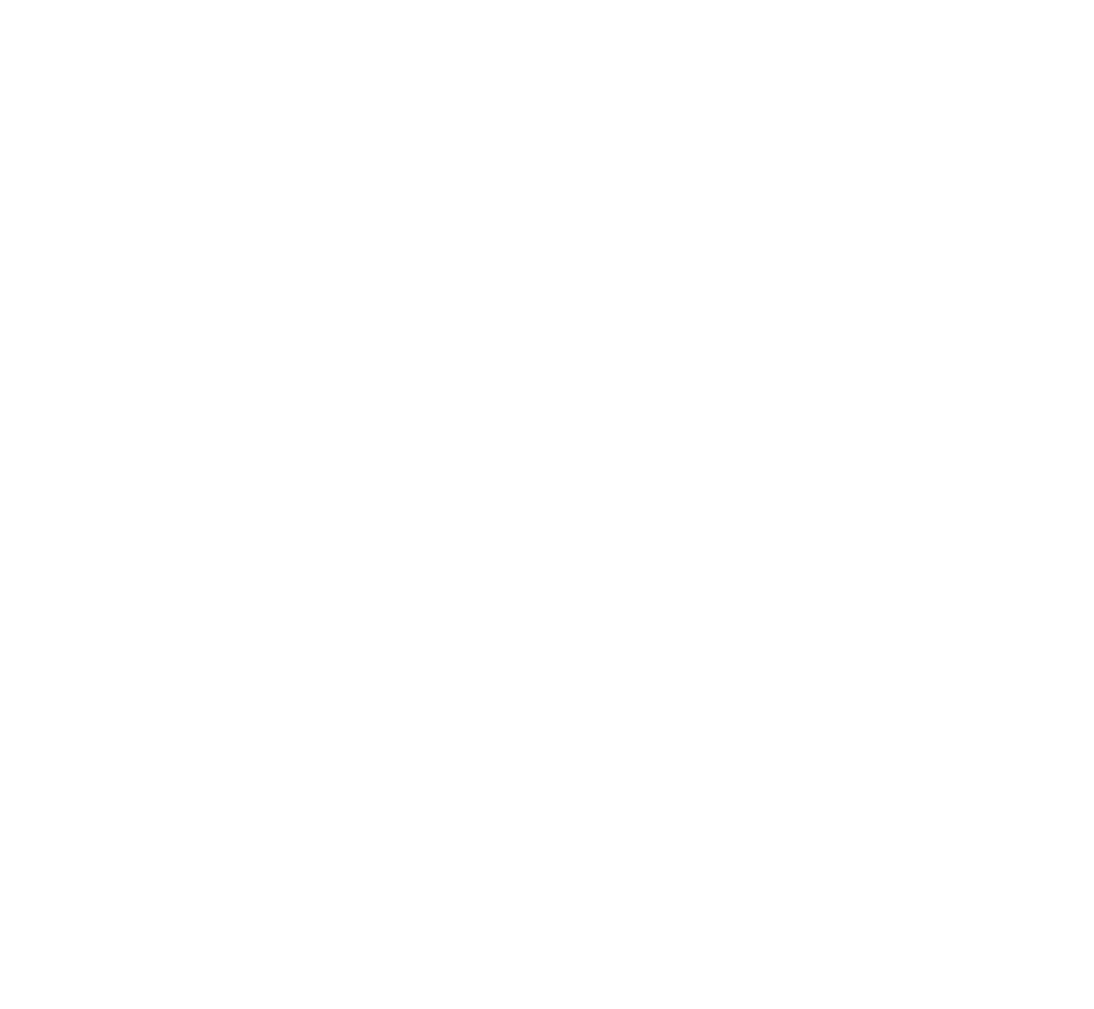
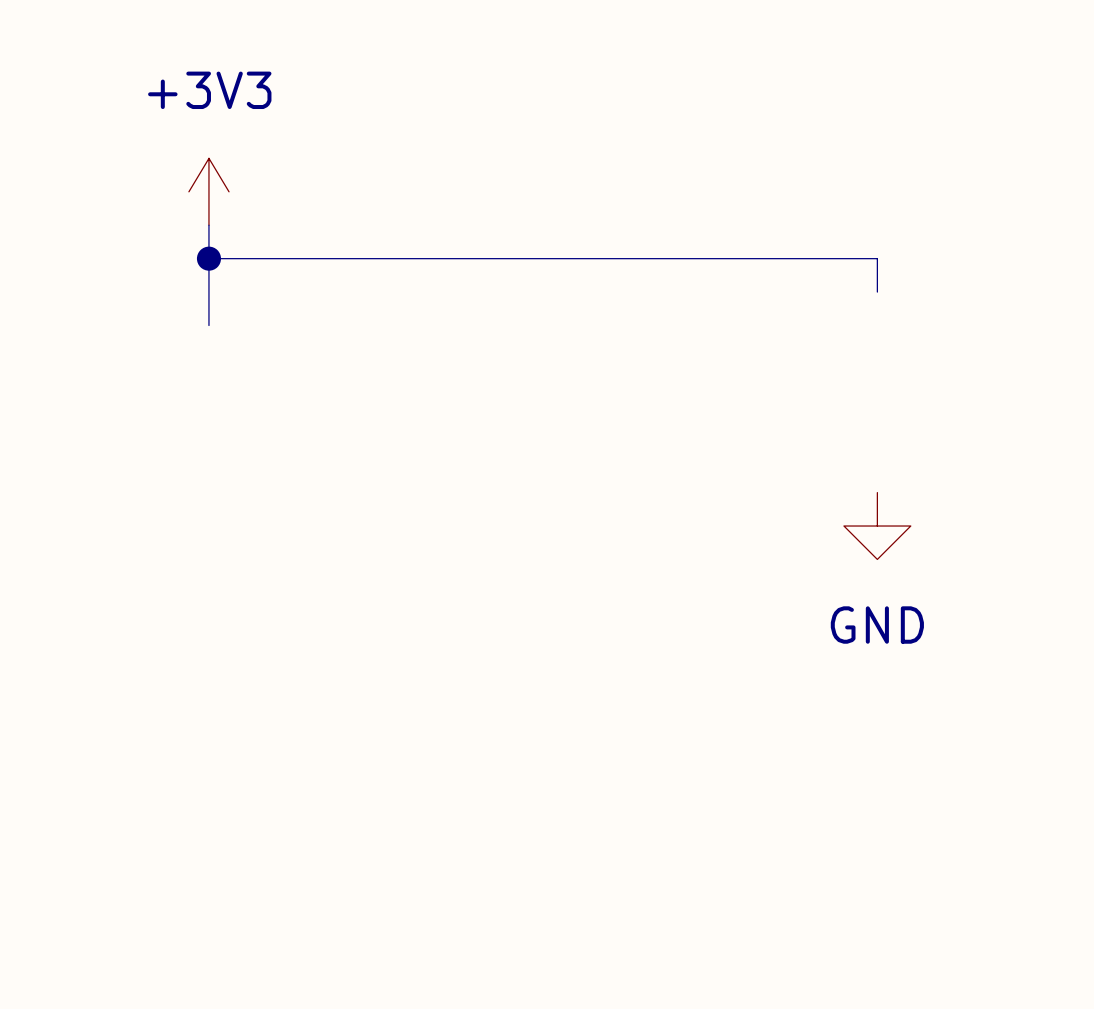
power symbol: none -> +3V3 (208, 191)
wire: none -> (208, 225) (208, 325)
wire: none -> (208, 258) (877, 258) (877, 292)
junction: none -> (208, 258)
power symbol: none -> GND (877, 526)

